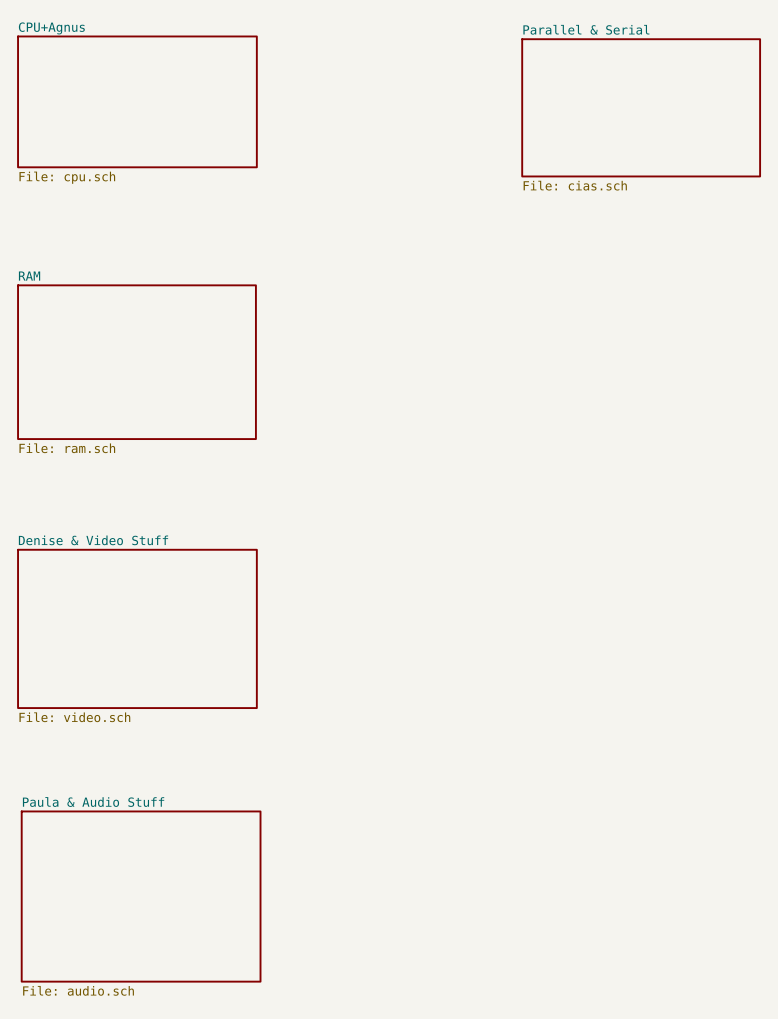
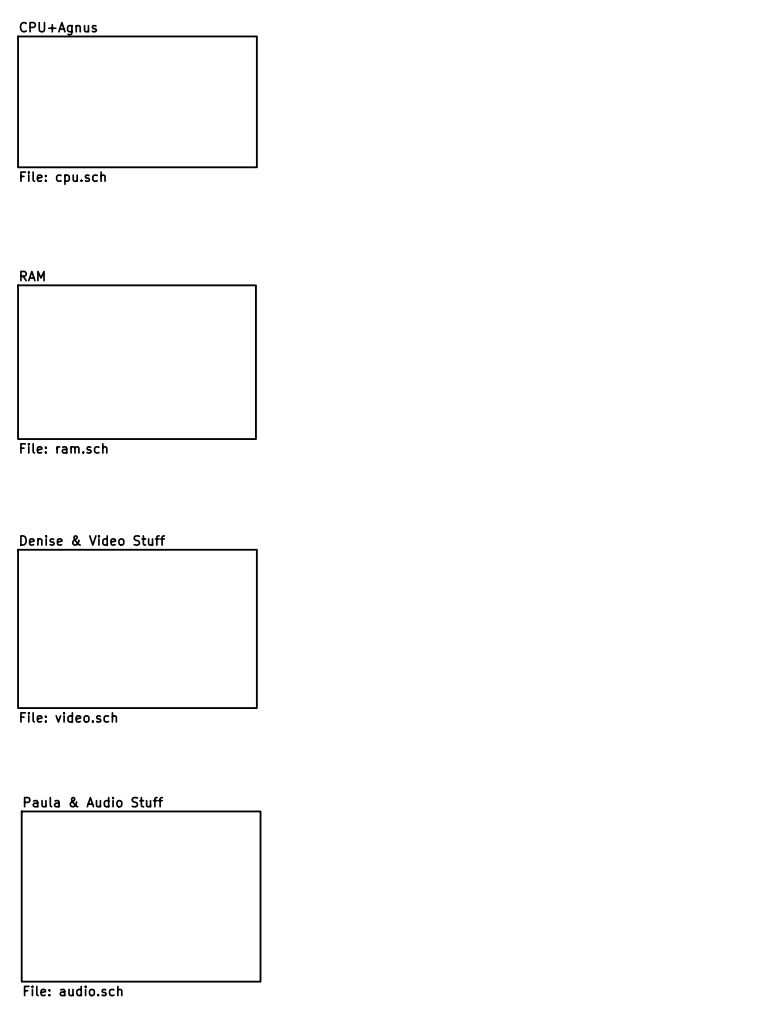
sheet Parallel & Serial: File: cias.sch (641, 107) -> none

